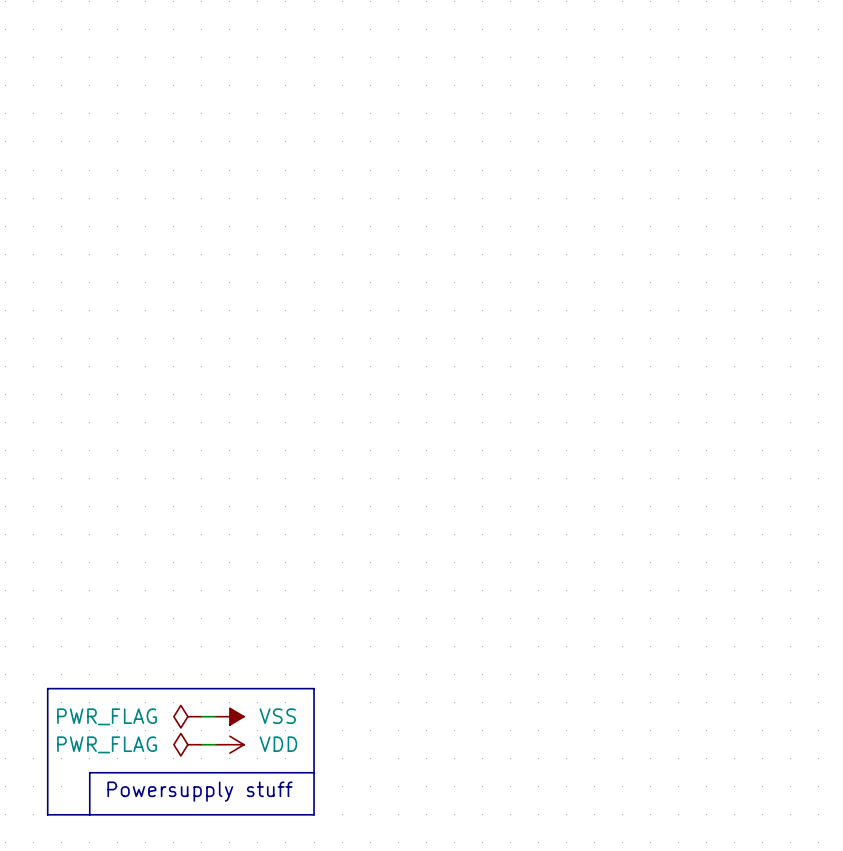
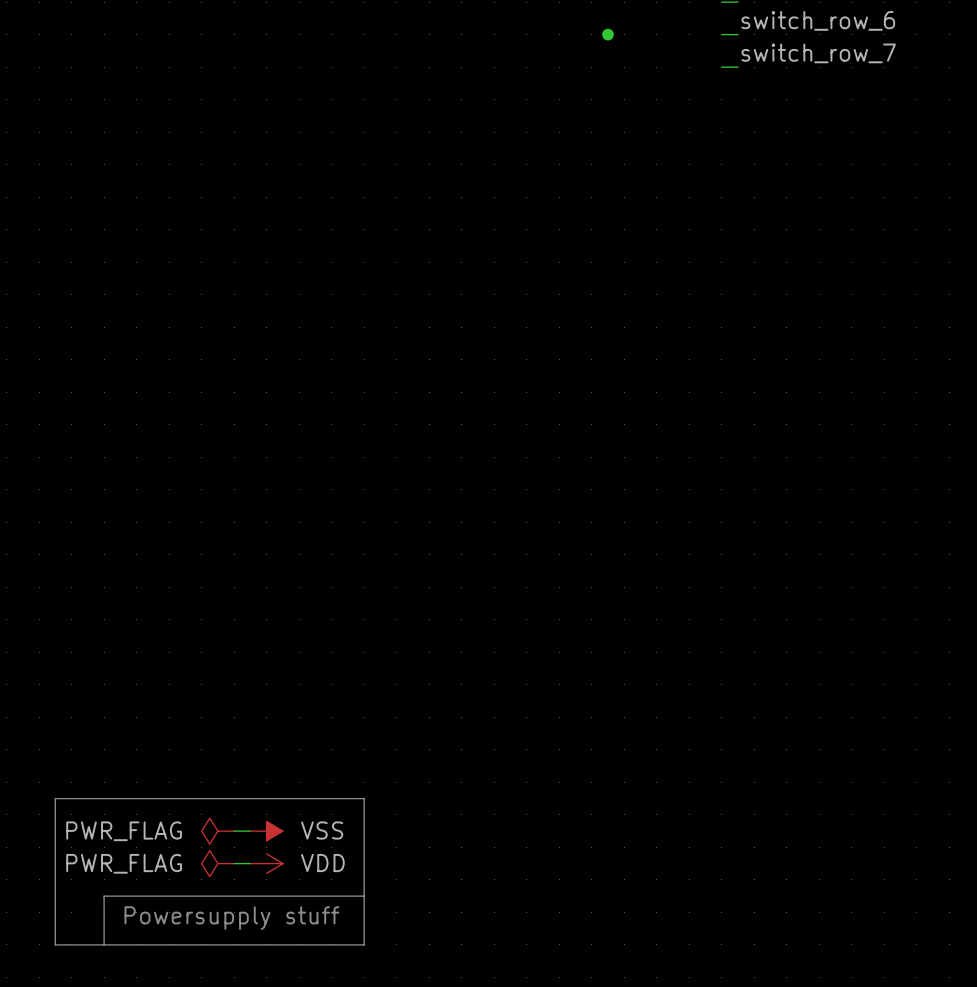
wire: none -> (721, 2) (738, 2)
label: none -> switch_row_6 (818, 20)
junction: none -> (607, 34)
wire: none -> (721, 34) (738, 34)
label: none -> switch_row_7 (818, 53)
wire: none -> (721, 67) (738, 67)

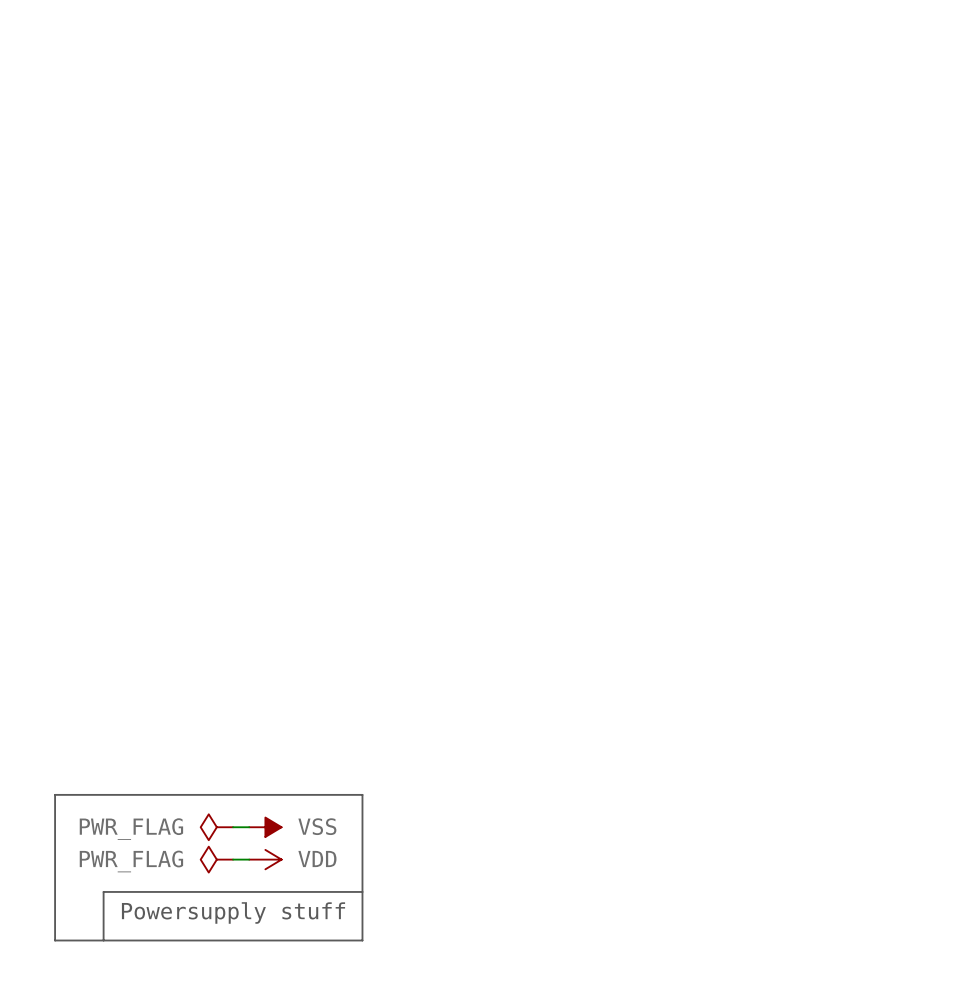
wire: (721, 2) (738, 2) -> none
label: switch_row_6 (818, 20) -> none
junction: (607, 34) -> none
wire: (721, 34) (738, 34) -> none
label: switch_row_7 (818, 53) -> none
wire: (721, 67) (738, 67) -> none

